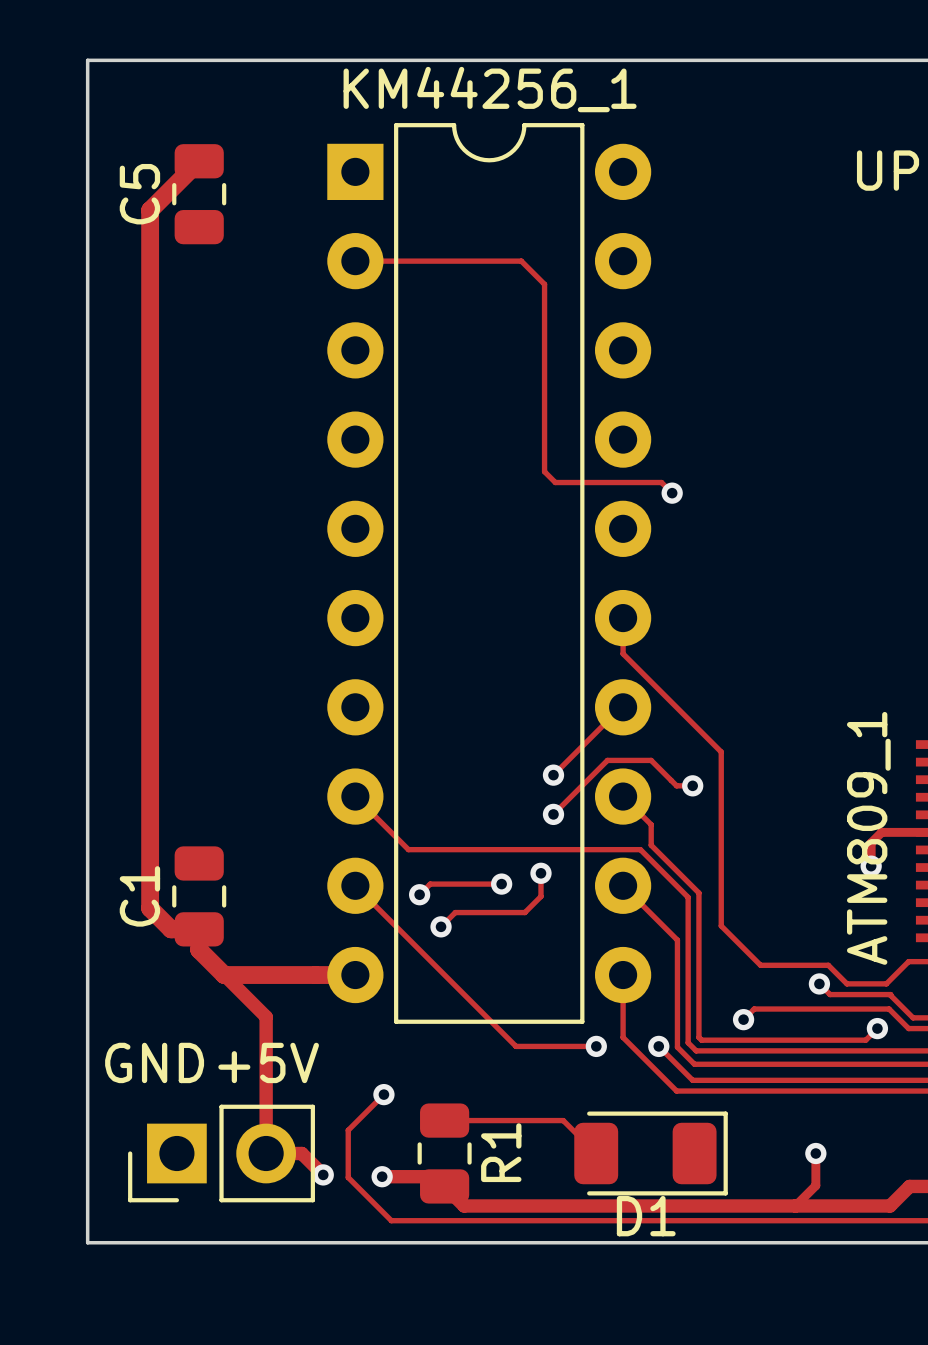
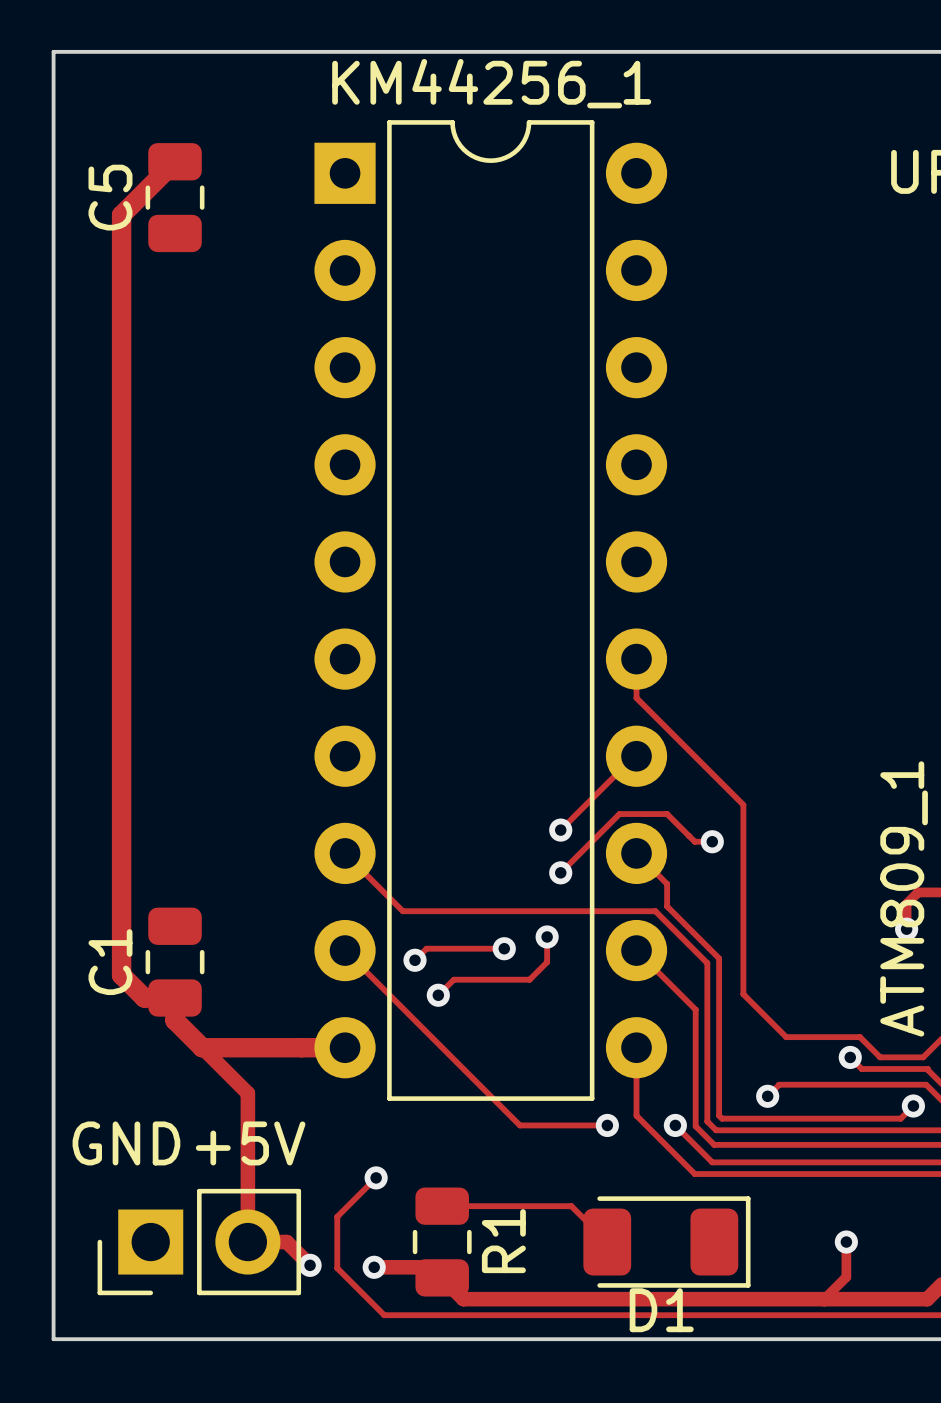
track: (355, 261) (521, 261) (544, 284) (544, 471) (555, 482) (661, 482) (672, 493) -> none
via: (672, 493) -> none

